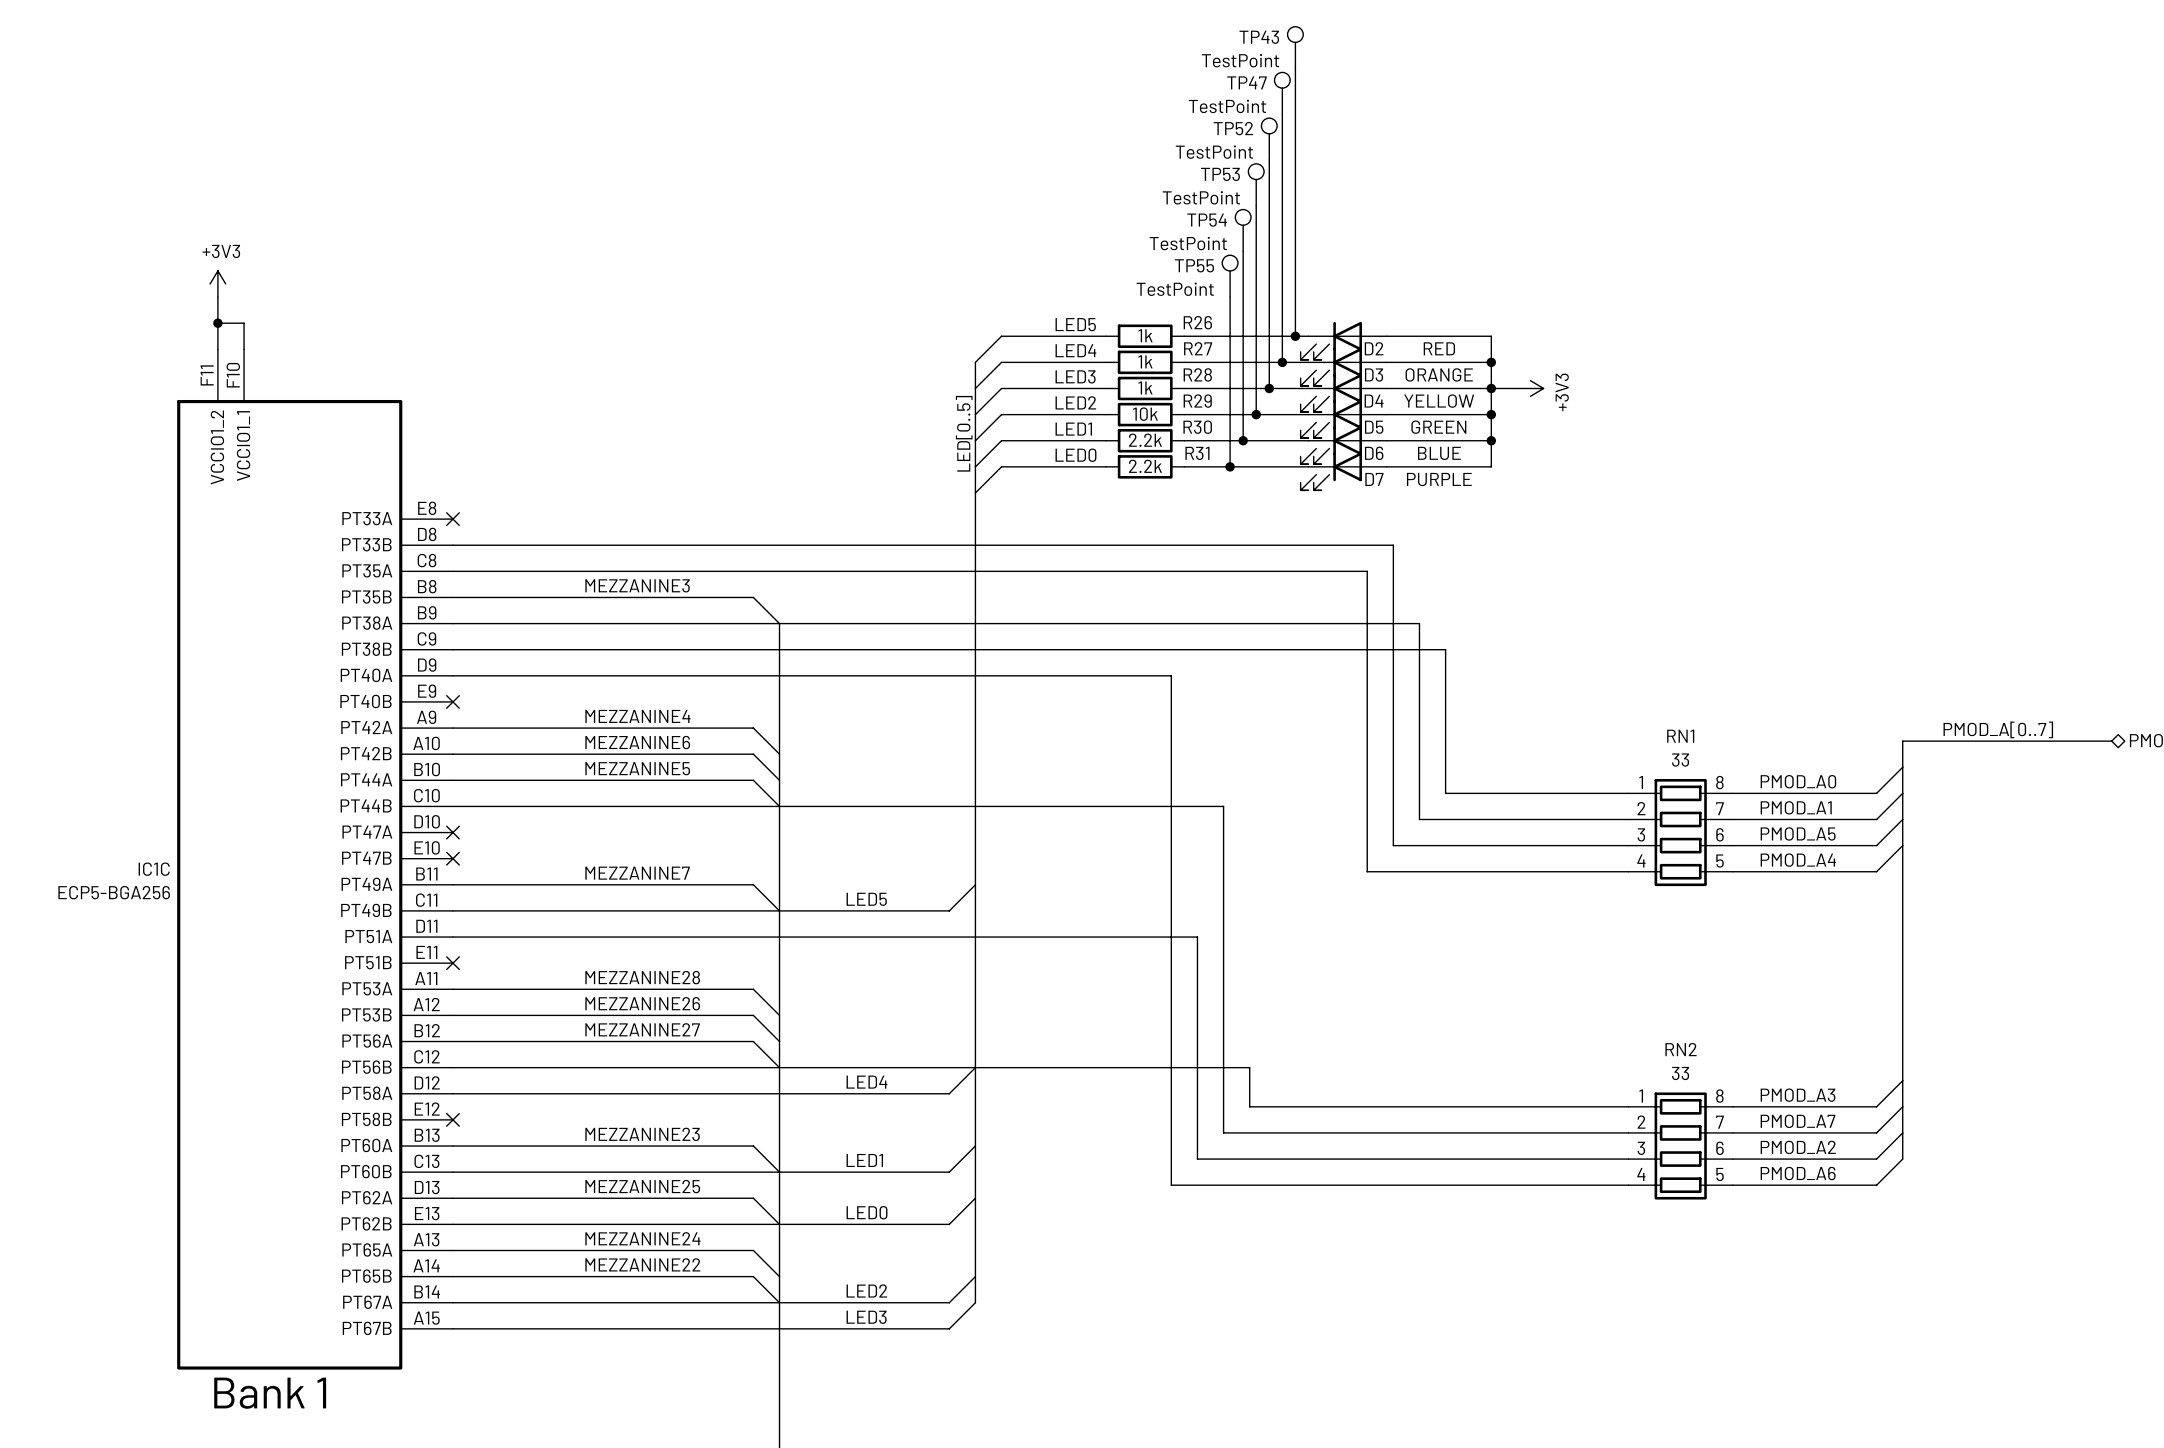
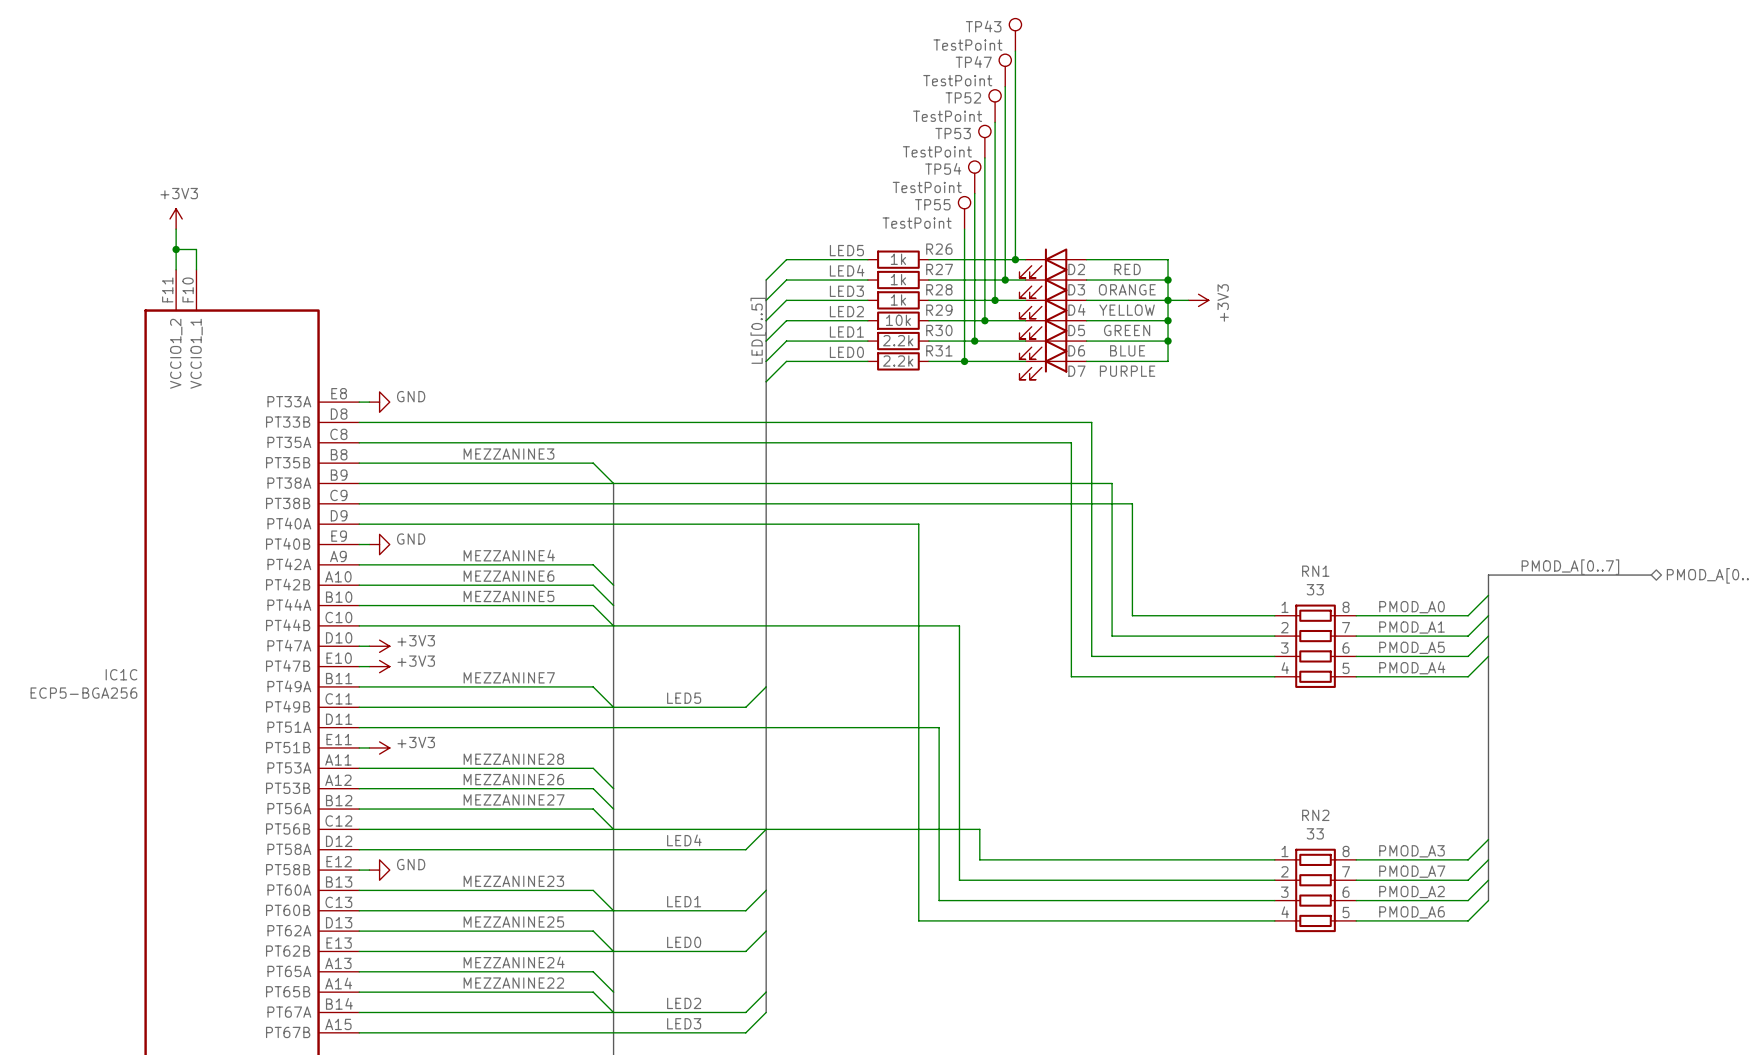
wire: none -> (359, 402) (369, 402)
no-connect mark: (453, 519) -> none
power symbol: none -> GND (379, 402)
wire: none -> (359, 544) (369, 544)
no-connect mark: (453, 701) -> none
power symbol: none -> GND (379, 544)
wire: none -> (359, 646) (369, 646)
no-connect mark: (453, 832) -> none
power symbol: none -> +3V3 (379, 646)
wire: none -> (359, 666) (369, 666)
no-connect mark: (453, 858) -> none
power symbol: none -> +3V3 (379, 666)
wire: none -> (359, 747) (369, 747)
no-connect mark: (453, 963) -> none
power symbol: none -> +3V3 (379, 747)
wire: none -> (359, 870) (369, 870)
no-connect mark: (453, 1119) -> none
power symbol: none -> GND (379, 870)

